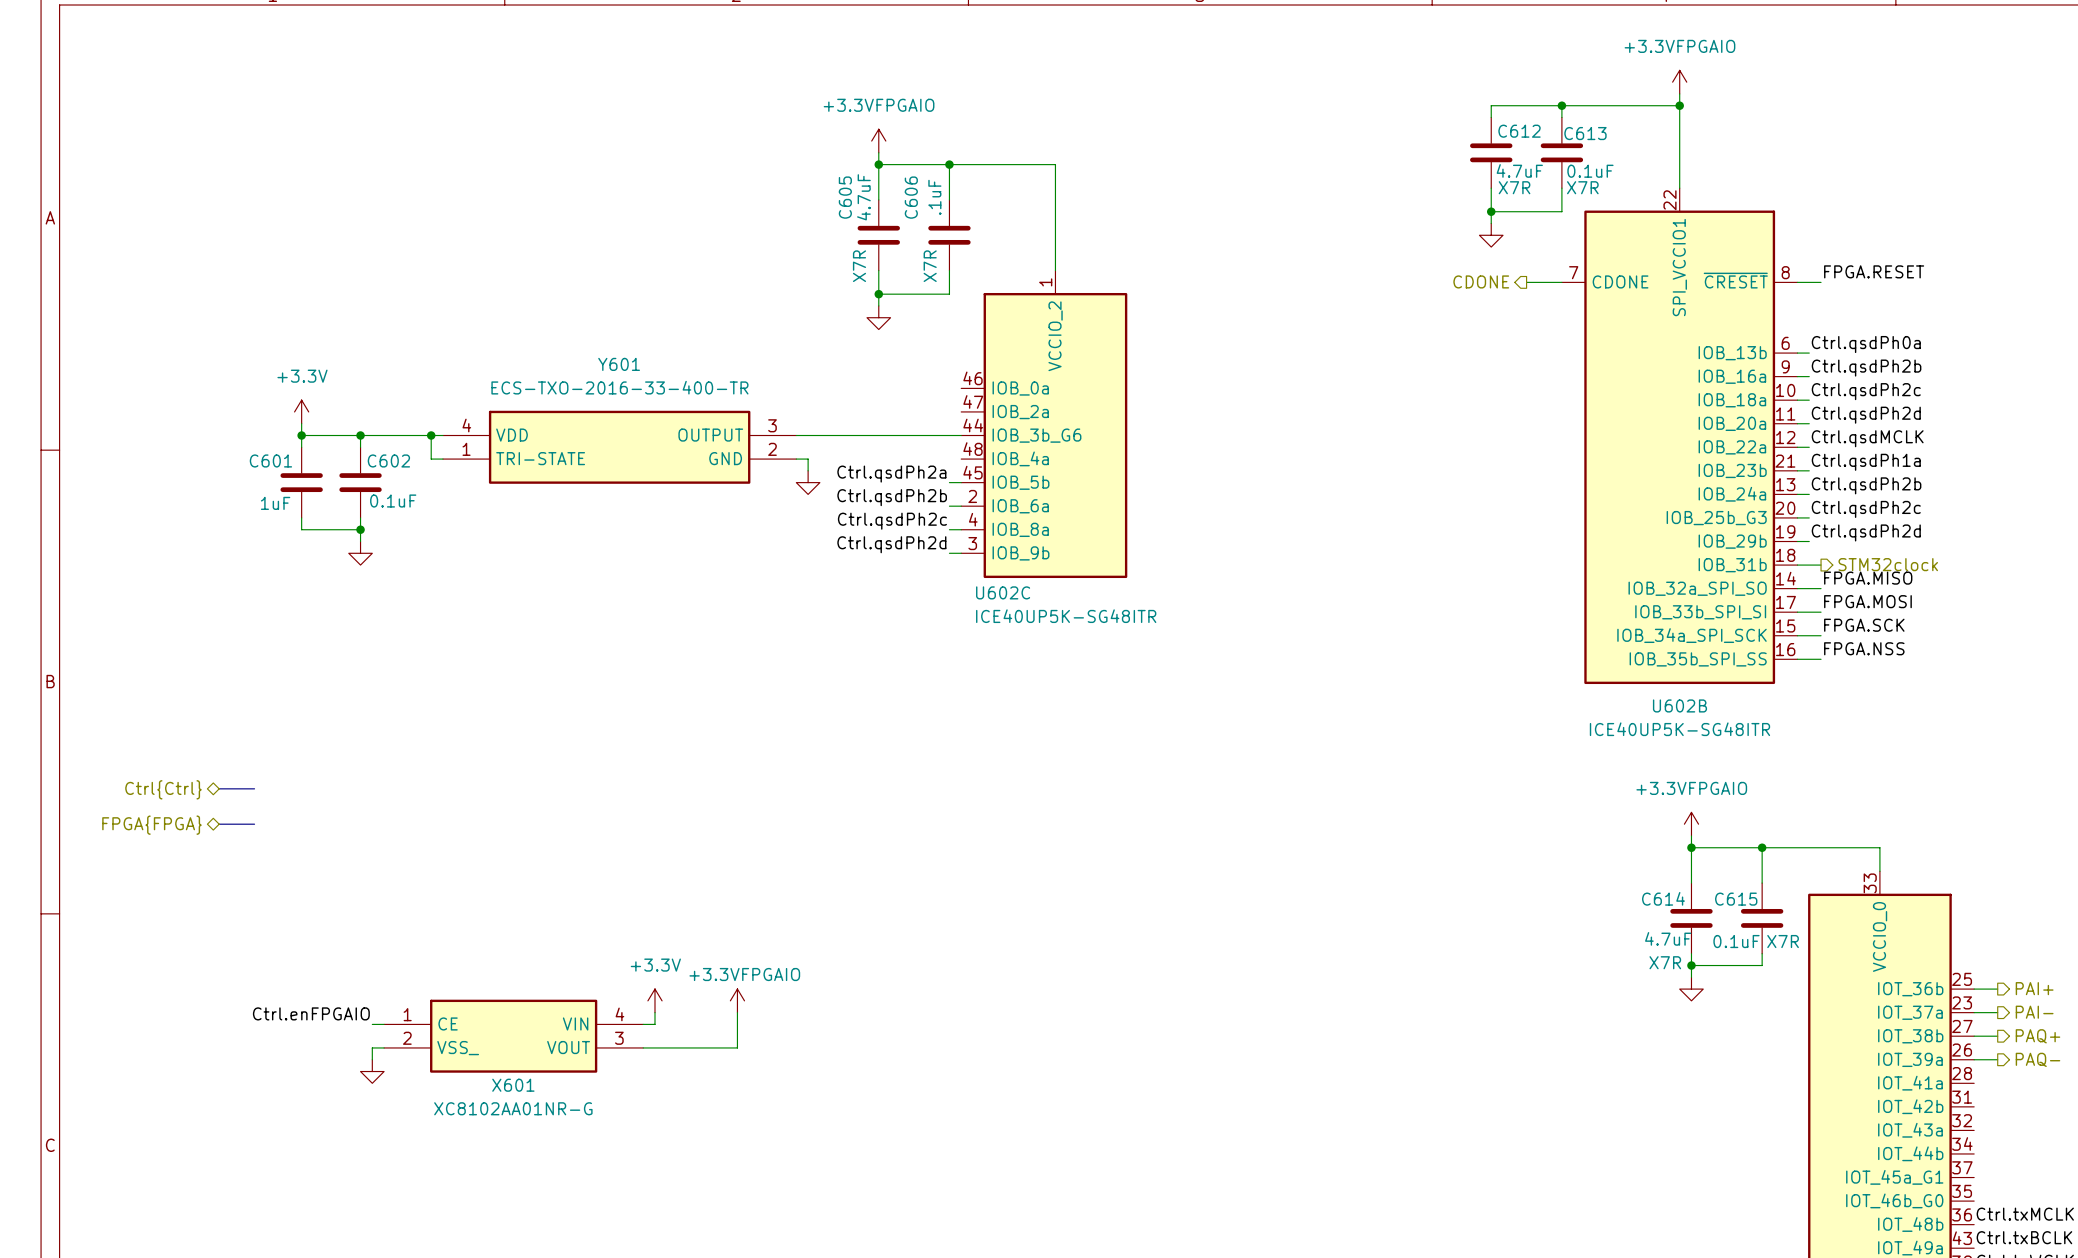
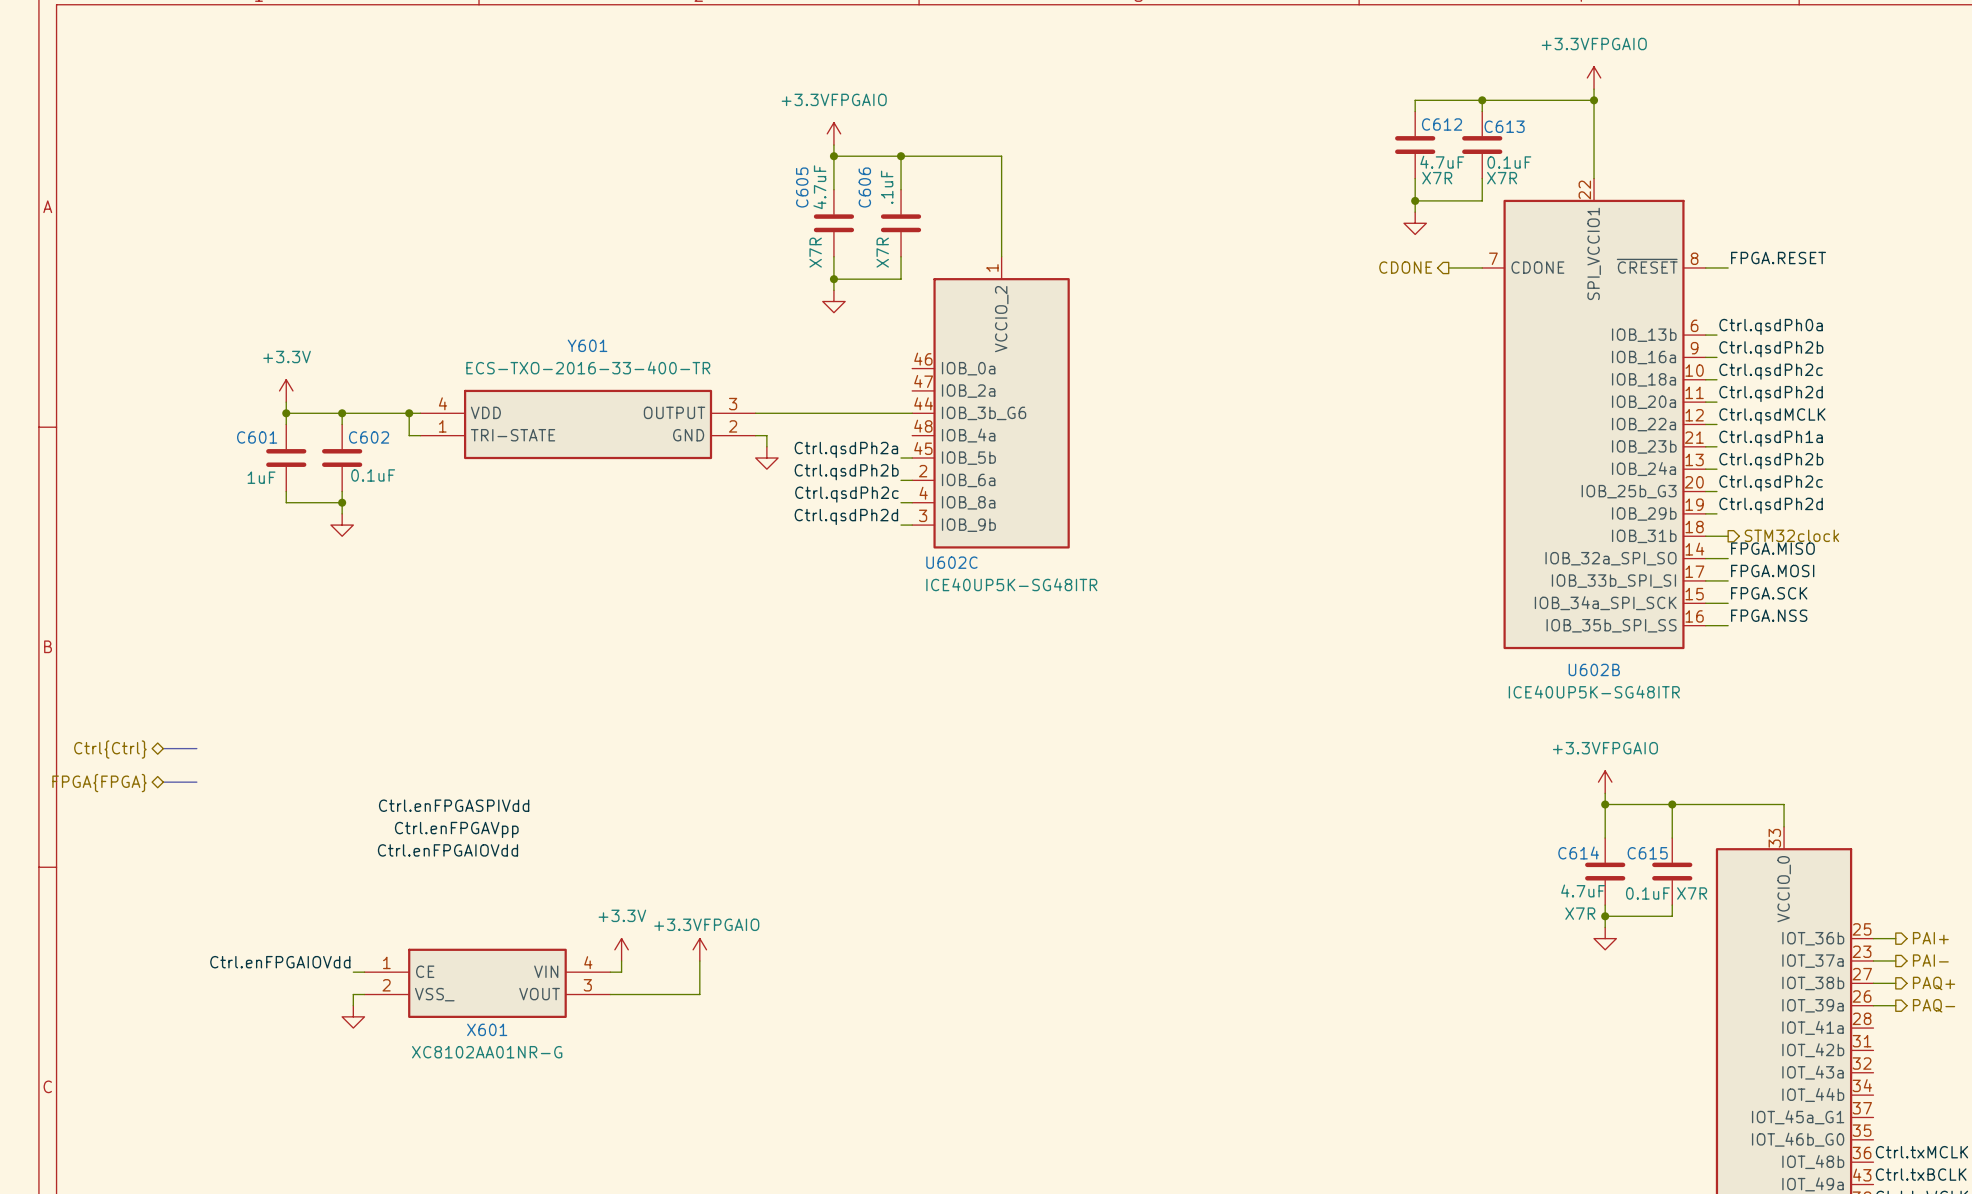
bus: (219, 788) (254, 788) -> (163, 748) (196, 748)
hierarchical label position: Ctrl{Ctrl} (163, 789) -> Ctrl{Ctrl} (110, 749)
bus: (219, 824) (254, 824) -> (163, 782) (196, 782)
hierarchical label position: FPGA{FPGA} (151, 825) -> FPGA{FPGA} (99, 783)
label: none -> Ctrl.enFPGASPIVdd (454, 805)
label: none -> Ctrl.enFPGAVpp (456, 829)
label: none -> Ctrl.enFPGAIOVdd (447, 850)
label: Ctrl.enFPGAIO (311, 1013) -> Ctrl.enFPGAIOVdd (280, 962)

